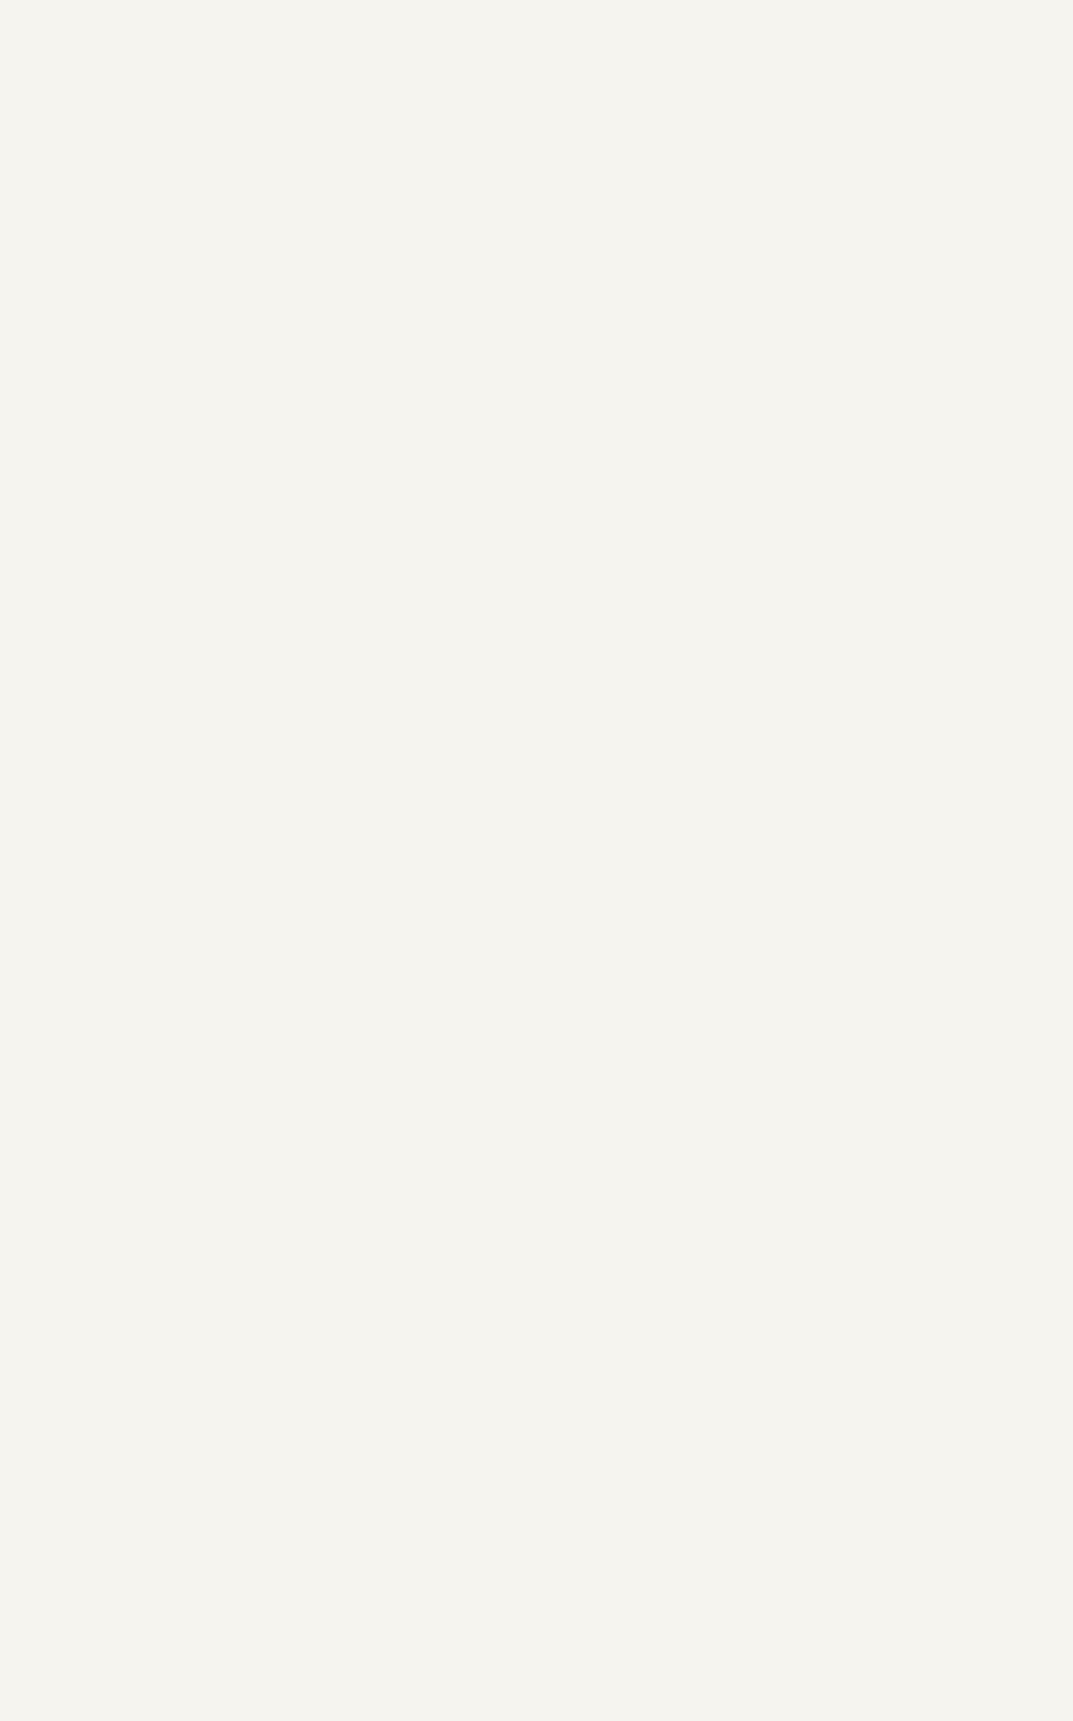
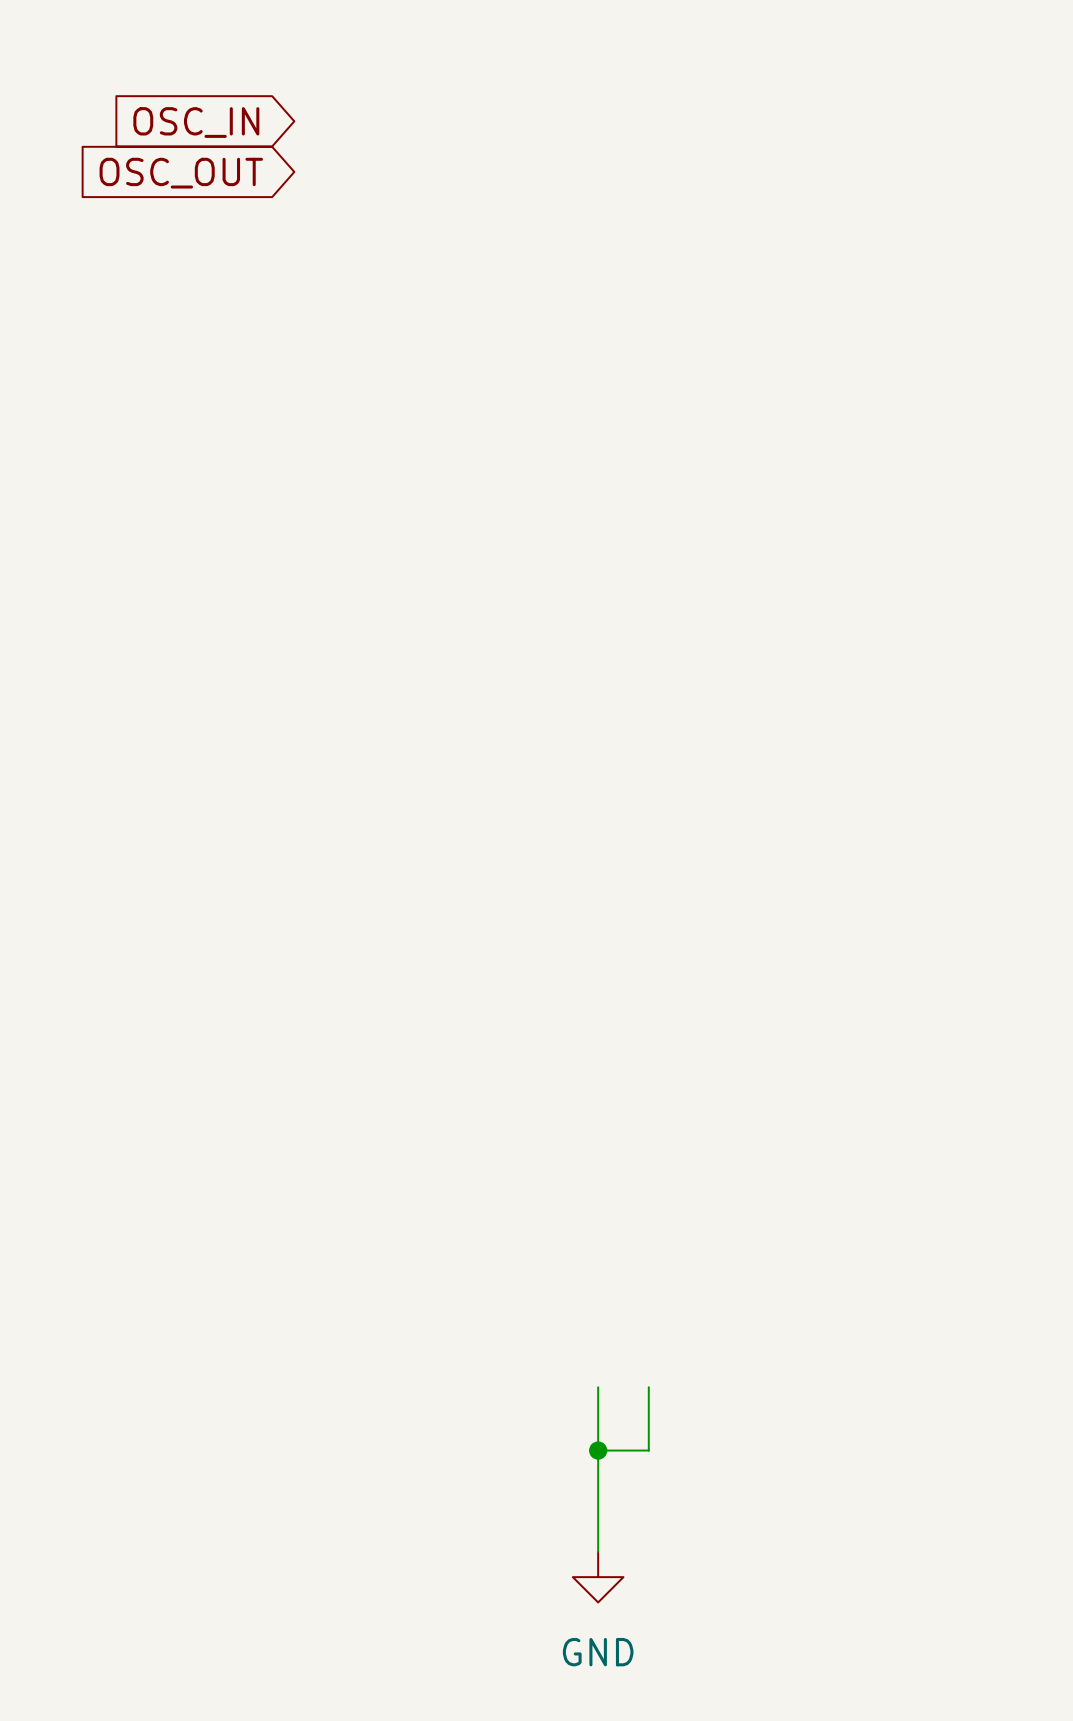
global label: none -> OSC_IN (196, 122)
global label: none -> OSC_OUT (181, 173)
wire: none -> (598, 1387) (598, 1551)
wire: none -> (648, 1387) (648, 1450) (598, 1450)
junction: none -> (598, 1450)
power symbol: none -> GND (598, 1577)

